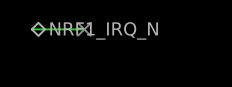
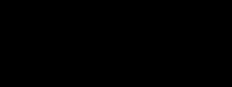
wire: (31, 29) (84, 29) -> none
no-connect mark: (84, 29) -> none
hierarchical label: NRF1_IRQ_N (104, 30) -> none

